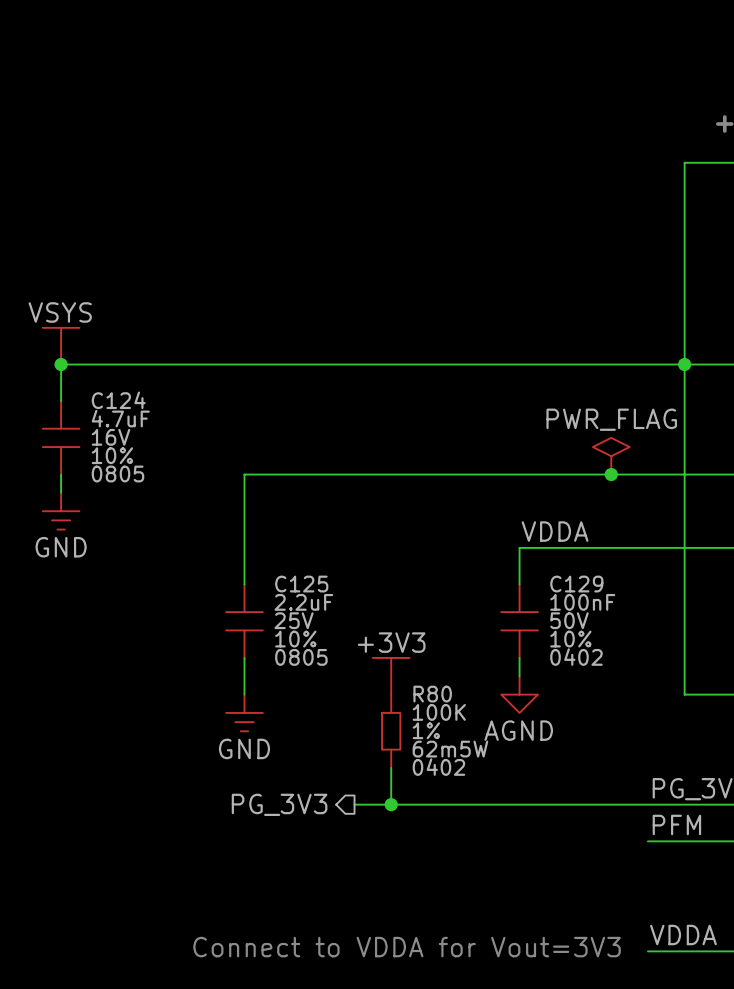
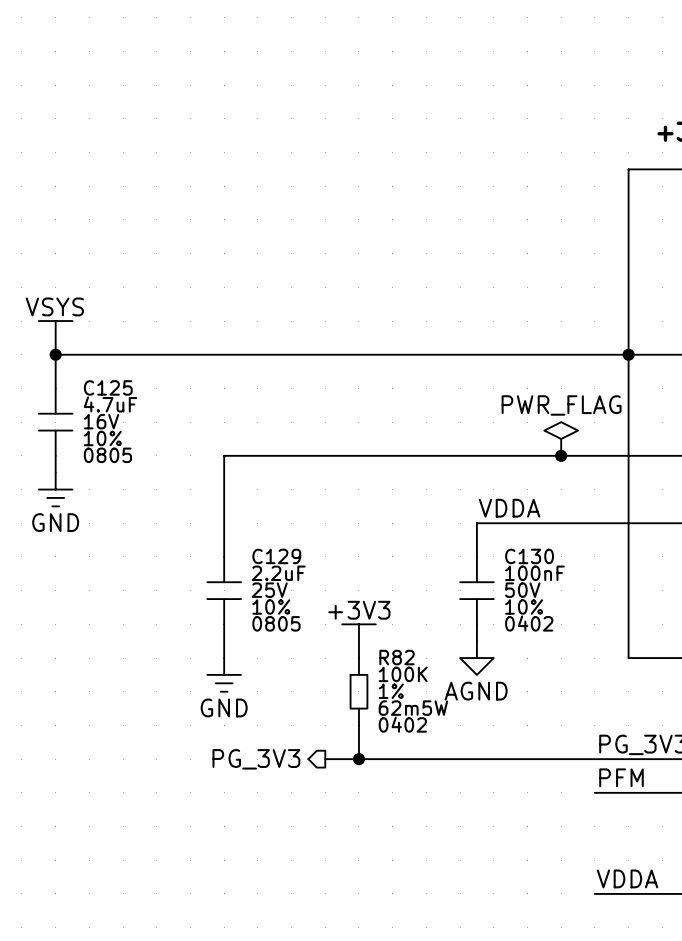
C124 name: C124 (118, 400) -> C125 (108, 387)
C125 name: C125 (301, 584) -> C129 (276, 556)
C129 name: C129 (576, 584) -> C130 (529, 556)
R80 name: R80 (432, 694) -> R82 (397, 657)
text: Connect to VDDA for Vout=3V3 (407, 947) -> none

